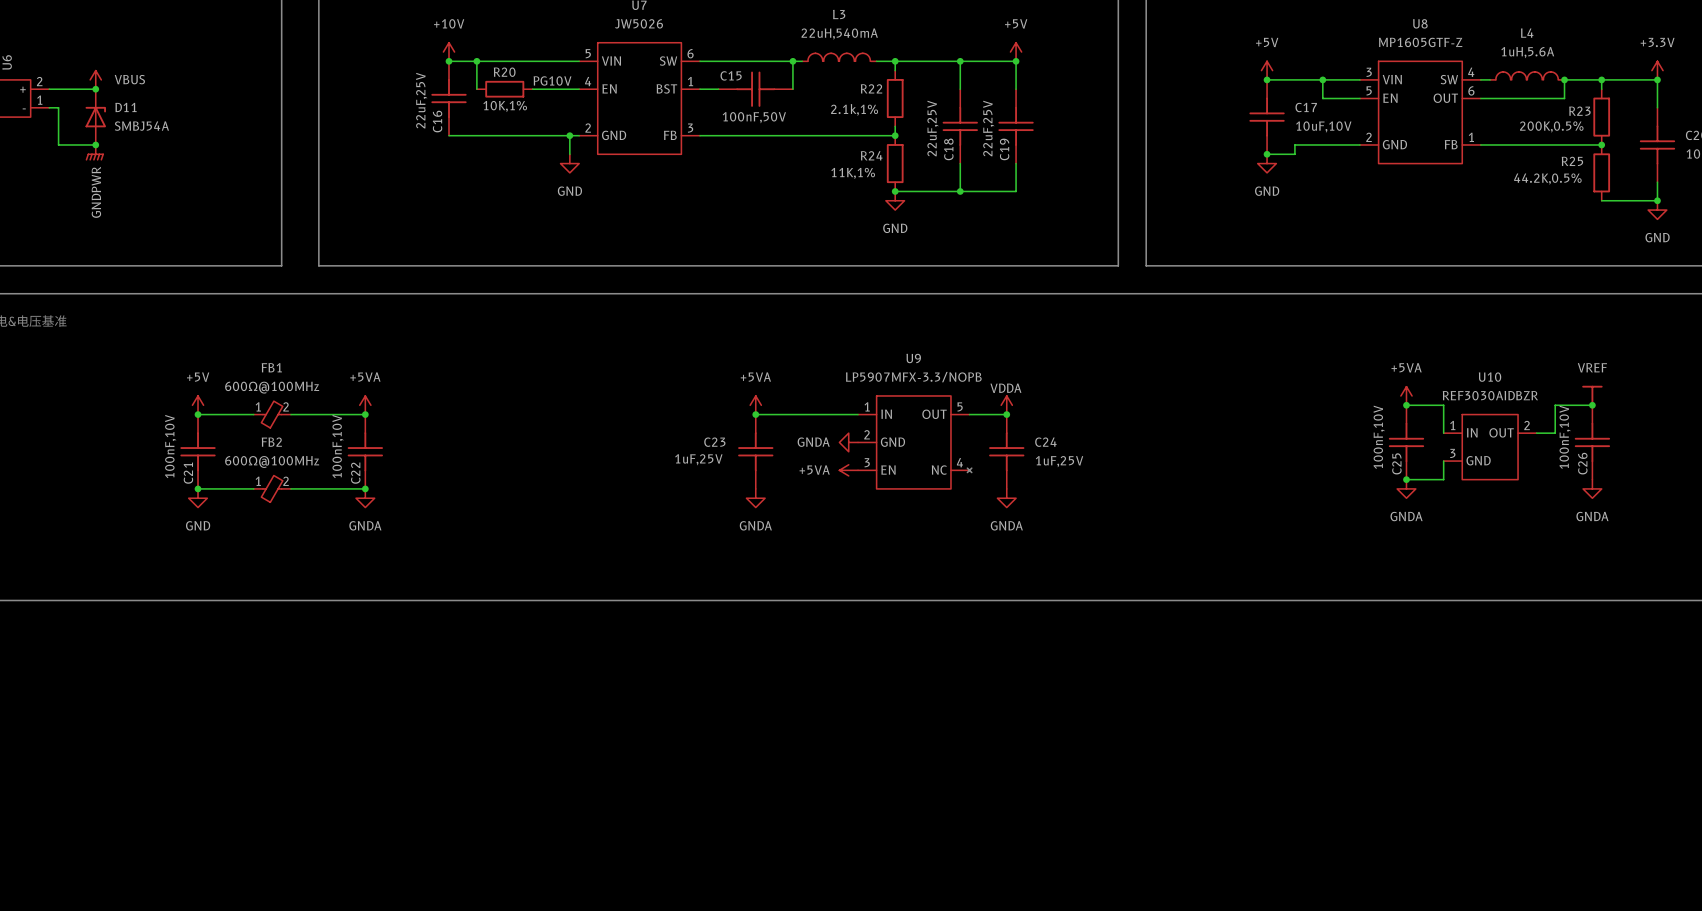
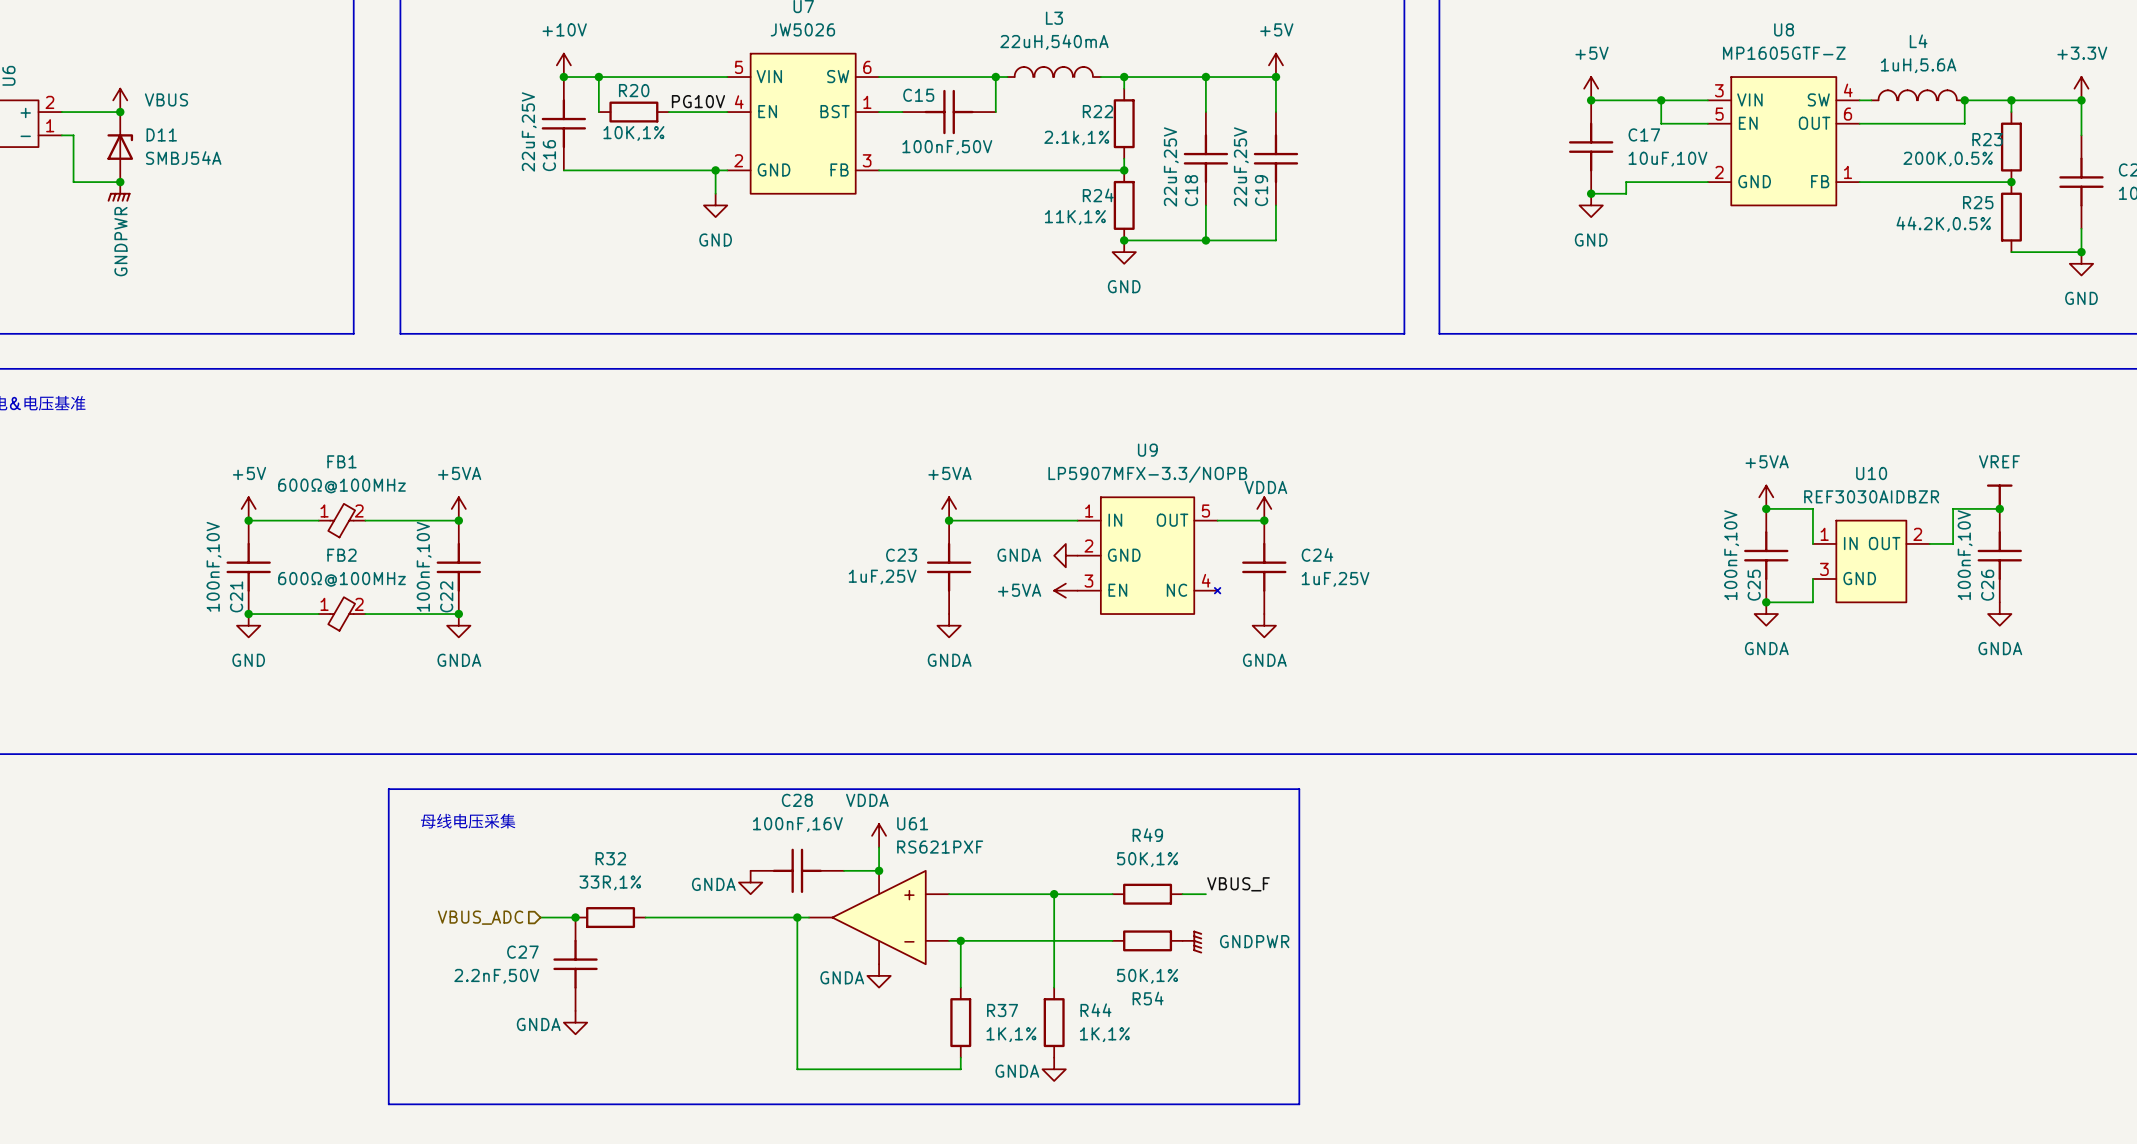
line: none -> (388, 789) (1299, 789) (1299, 1104) (388, 1104) (388, 789)
text: none -> 母线电压采集 (468, 821)
power symbol: none -> VDDA (879, 835)
wire: none -> (879, 847) (879, 870) (844, 870)
C28: none -> 100nF,16V (797, 870)
junction: none -> (879, 870)
power symbol: none -> GNDA (750, 882)
label: none -> VBUS_F (1238, 884)
wire: none -> (949, 894) (1112, 894)
wire: none -> (1054, 894) (1054, 987)
junction: none -> (1054, 894)
R49: none -> 50K,1% (1147, 894)
wire: none -> (1182, 894) (1205, 894)
wire: none -> (540, 917) (575, 917)
junction: none -> (575, 917)
R32: none -> 33R,1% (610, 917)
wire: none -> (645, 917) (809, 917)
wire: none -> (797, 917) (797, 1069) (960, 1069) (960, 1057)
junction: none -> (797, 917)
U61: none -> RS621PXF (879, 917)
hierarchical label: none -> VBUS_ADC (480, 917)
wire: none -> (949, 940) (1112, 940)
wire: none -> (960, 940) (960, 987)
junction: none -> (960, 940)
R54: none -> 50K,1% (1147, 940)
power symbol: none -> GNDPWR (1192, 942)
C27: none -> 2.2nF,50V (575, 964)
power symbol: none -> GNDA (879, 975)
power symbol: none -> GNDA (575, 1022)
R37: none -> 1K,1% (960, 1022)
R44: none -> 1K,1% (1054, 1022)
power symbol: none -> GNDA (1054, 1069)

